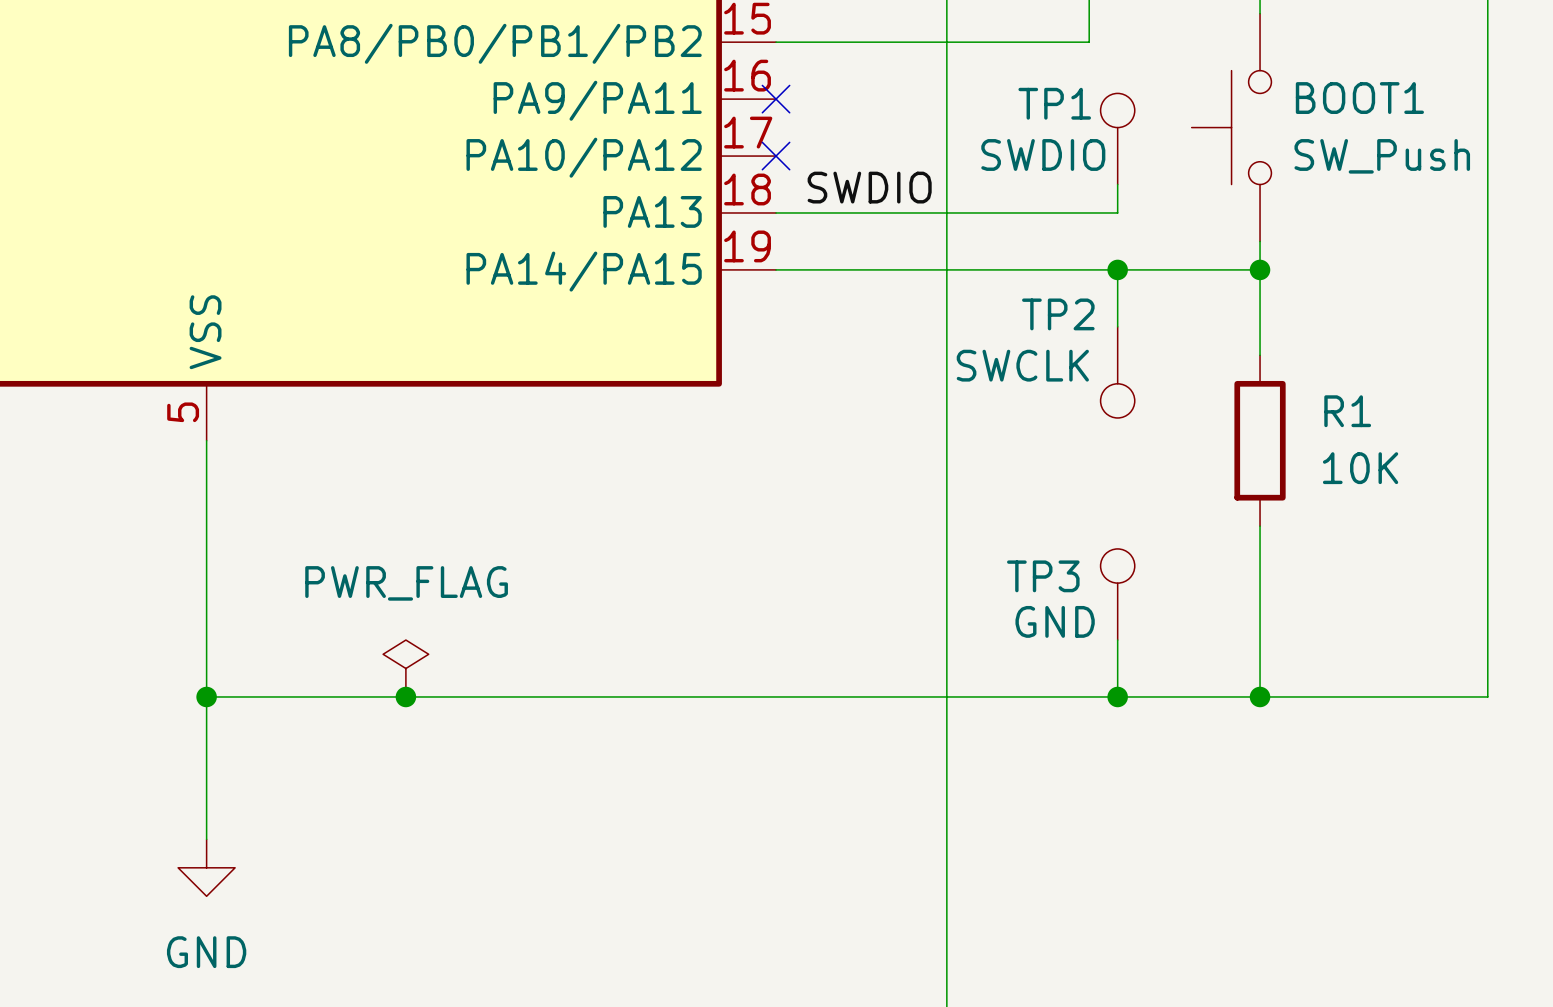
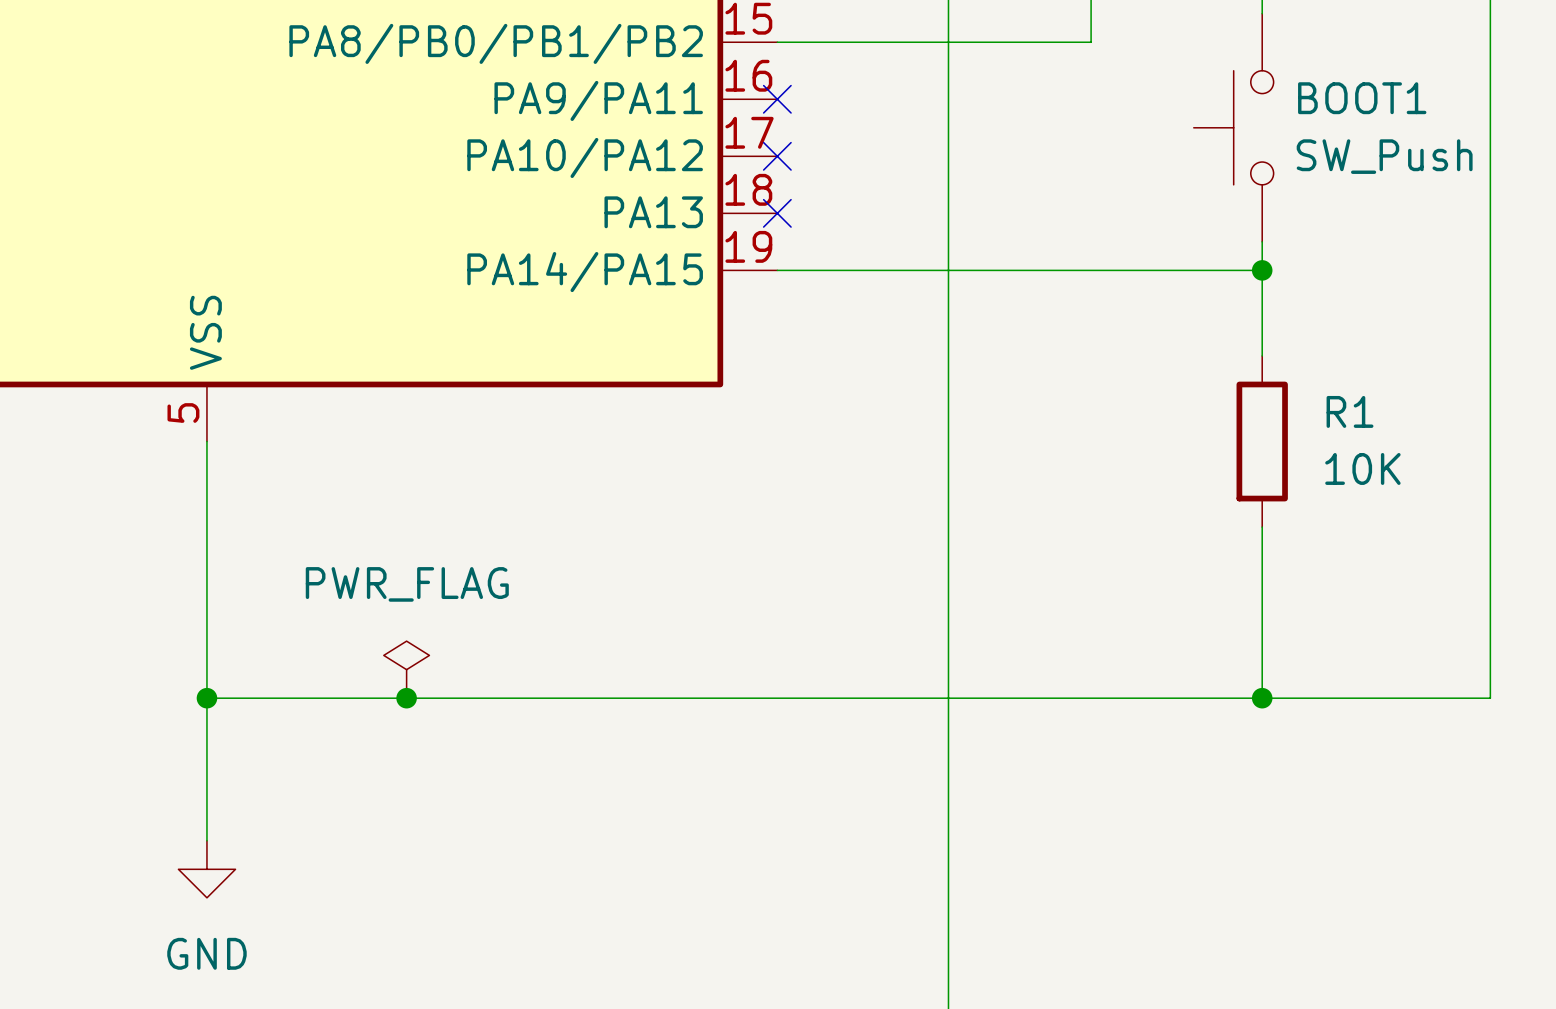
TP1: SWDIO (1117, 138) -> none
wire: (1117, 184) (1117, 212) (776, 212) -> none
label: SWDIO (869, 187) -> none
no-connect mark: none -> (777, 213)
wire: (1117, 269) (1117, 326) -> none
junction: (1117, 269) -> none
TP2: SWCLK (1117, 372) -> none
TP3: GND (1117, 594) -> none
wire: (1117, 640) (1117, 696) -> none
junction: (1117, 696) -> none

